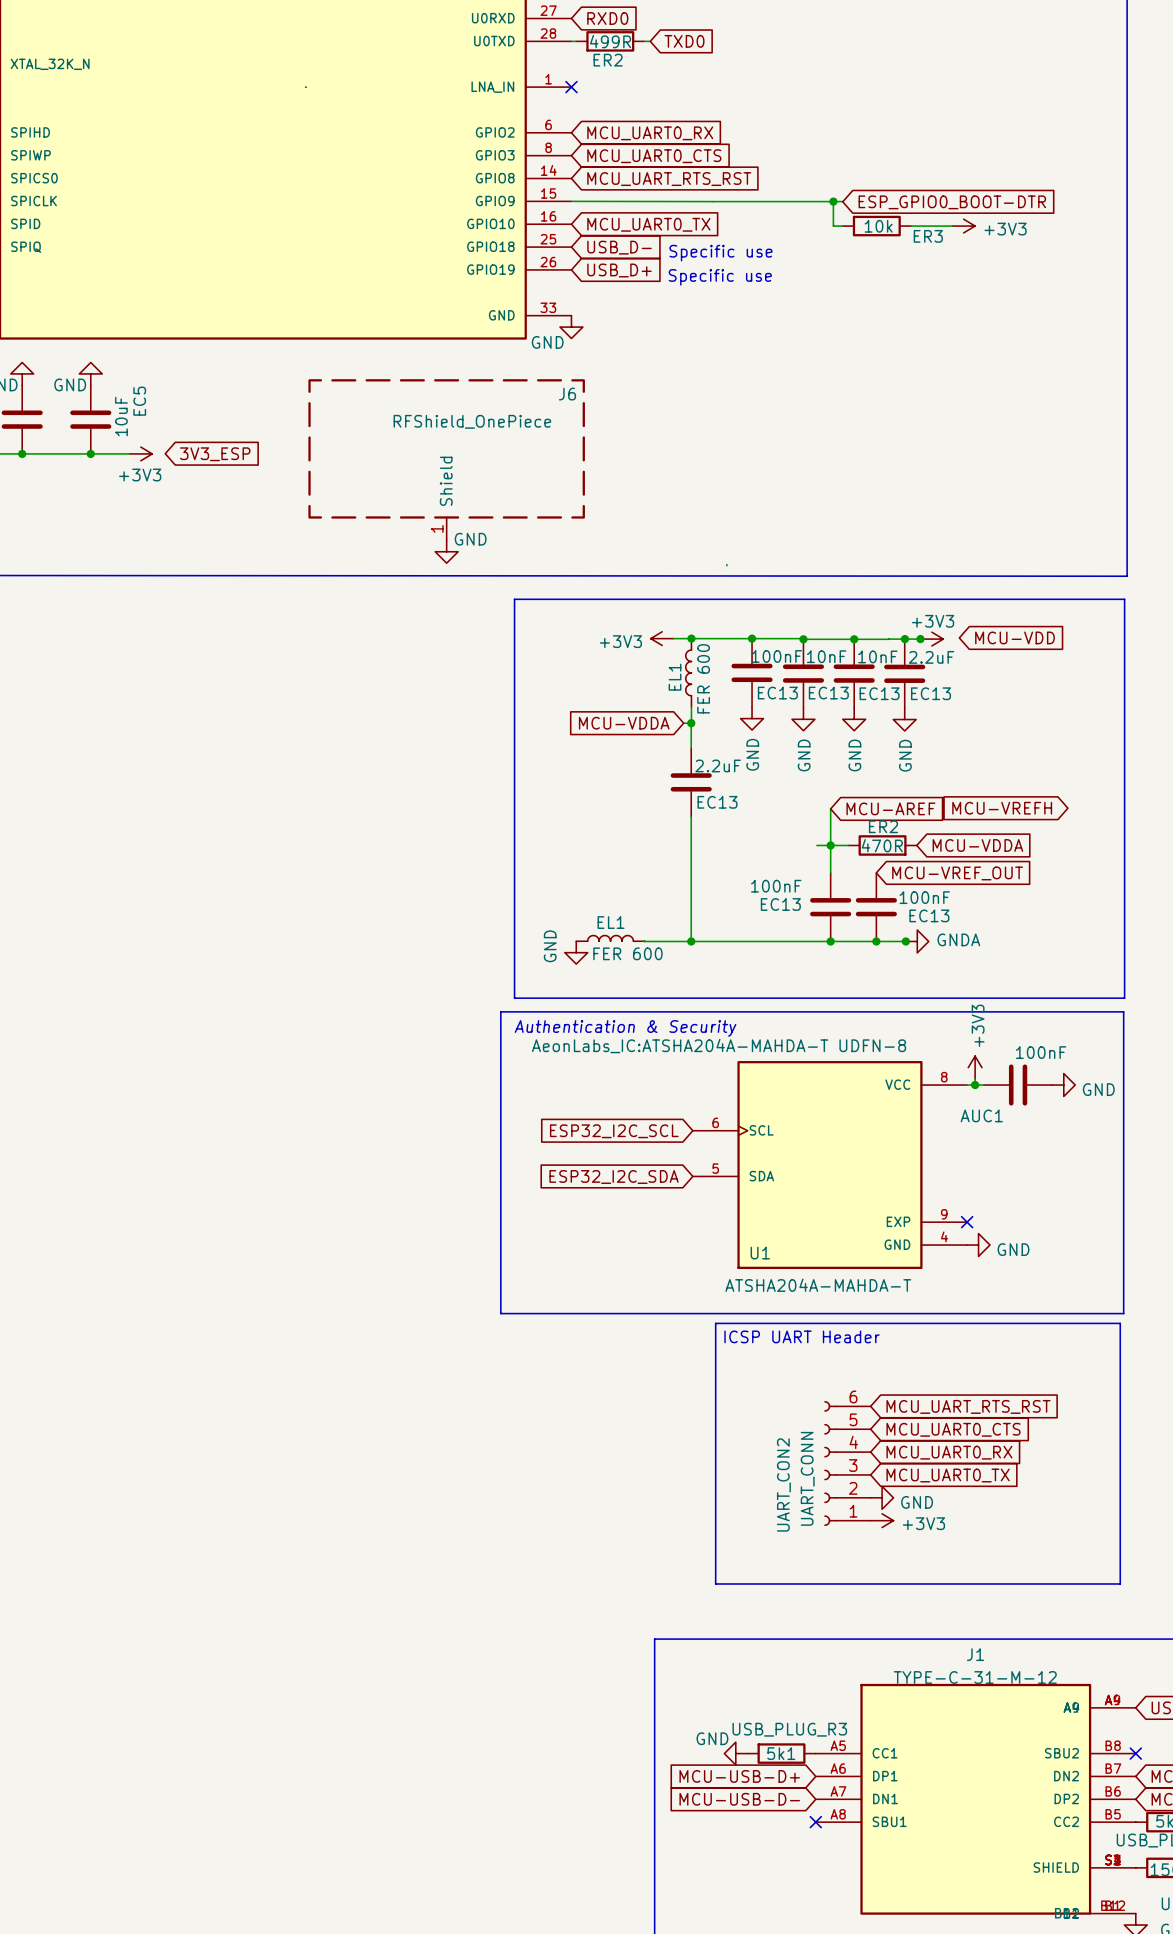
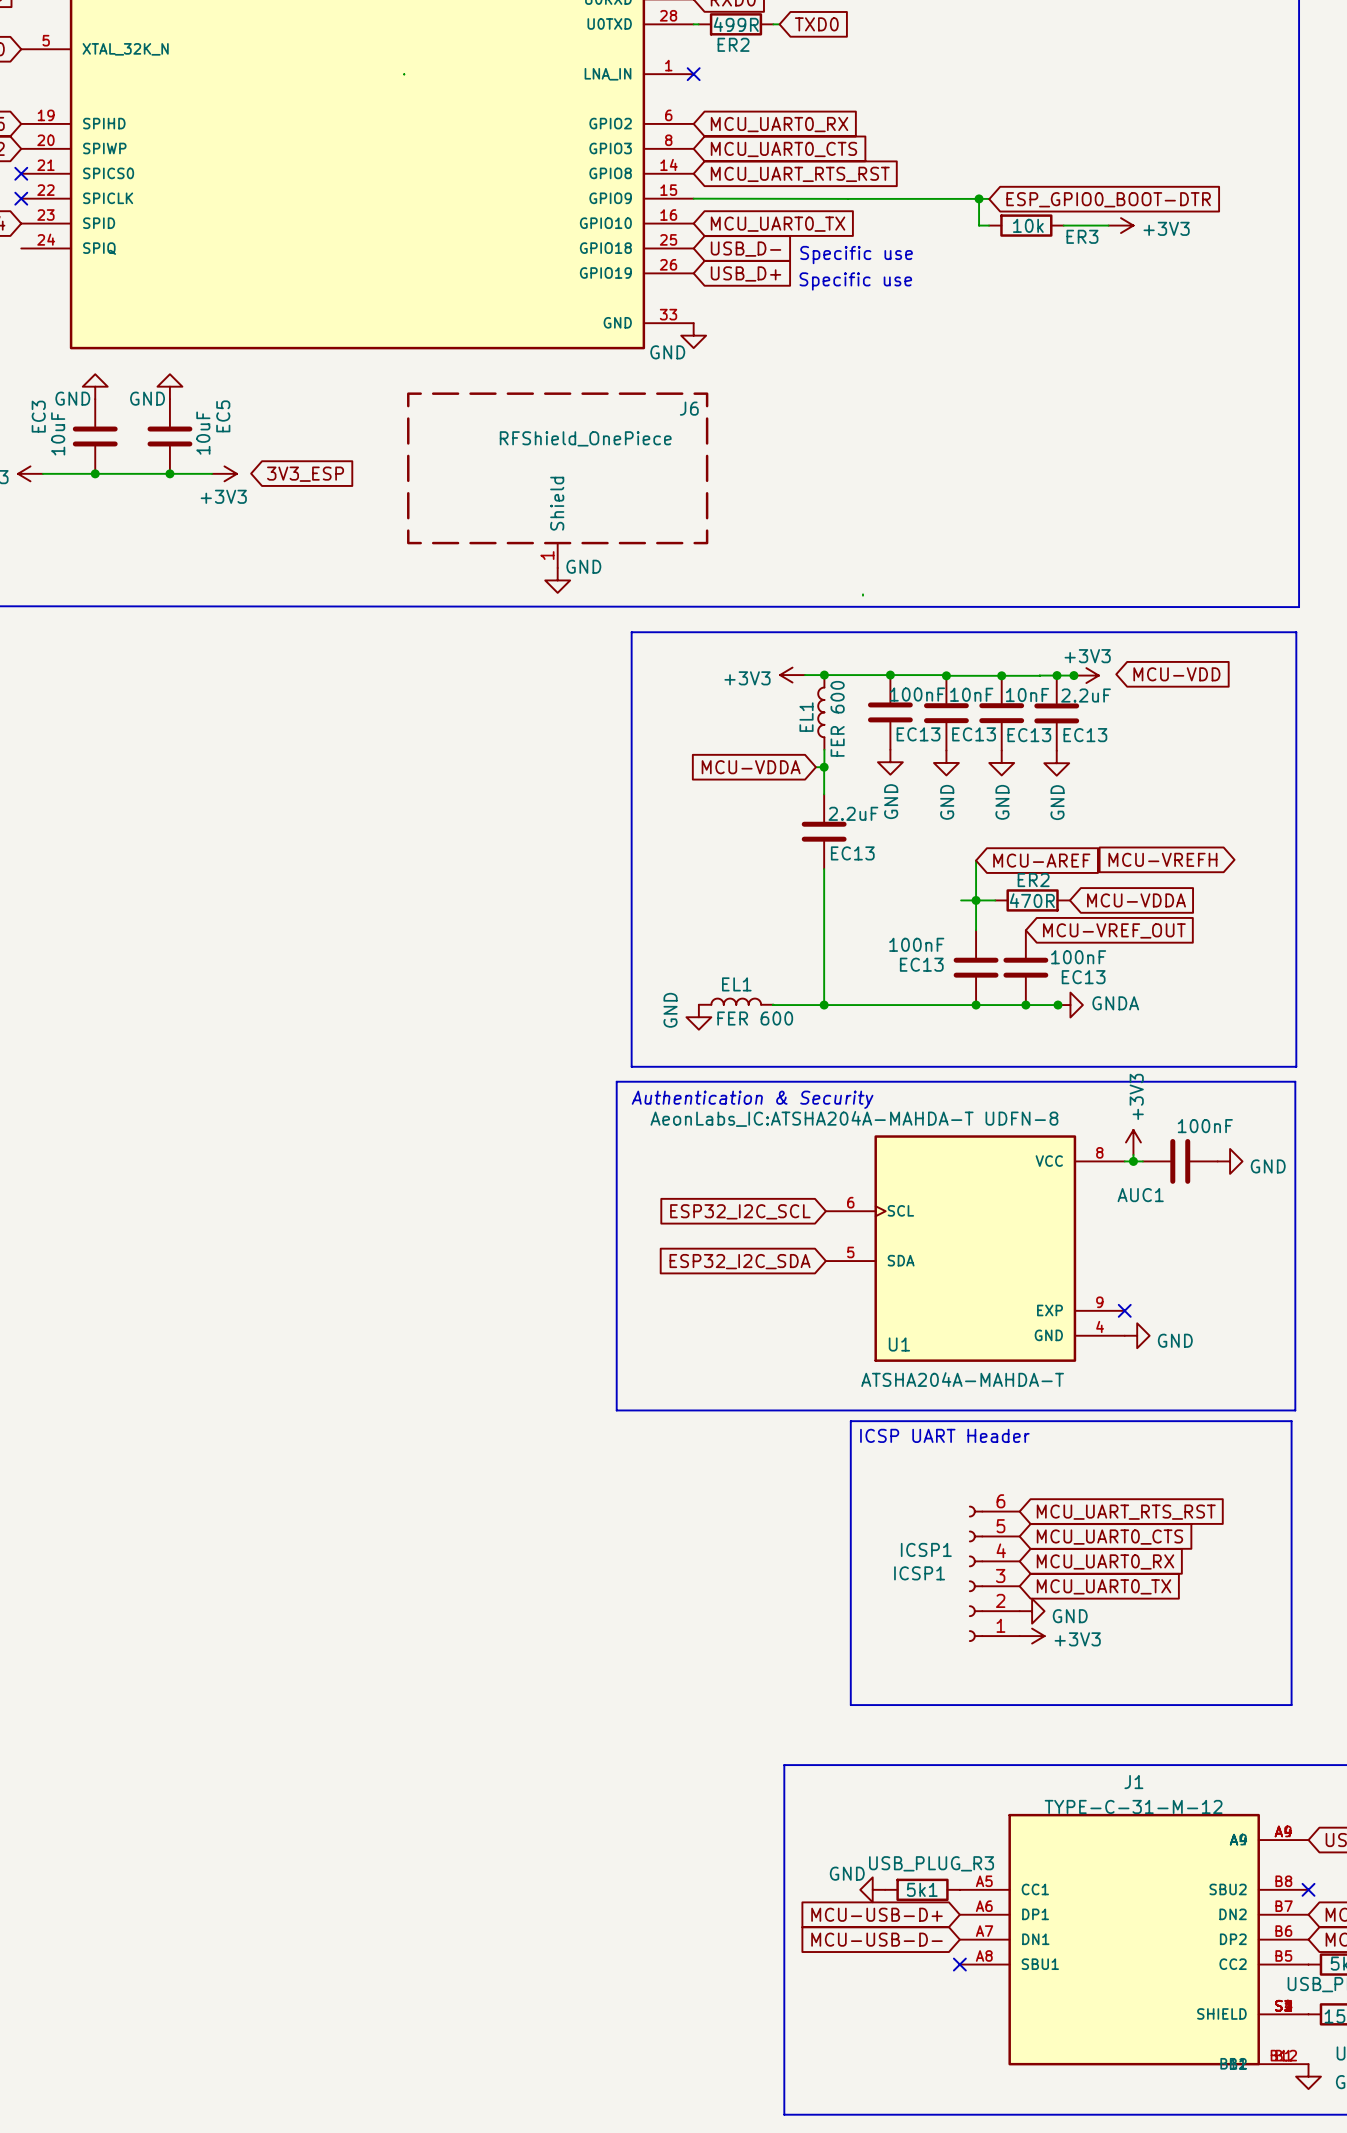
UART_CON2 value: UART_CONN (807, 1478) -> ICSP1 (926, 1549)
UART_CON2 name: UART_CON2 (783, 1484) -> ICSP1 (919, 1573)

